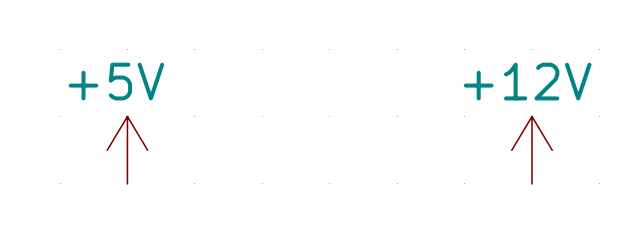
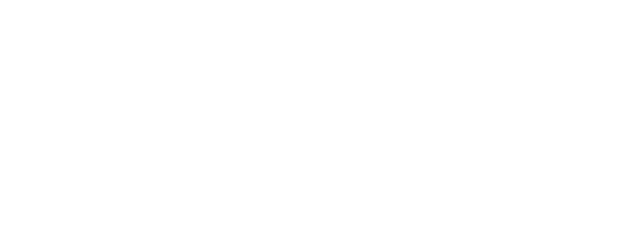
power symbol: +5V (127, 150) -> none
power symbol: +12V (532, 150) -> none

